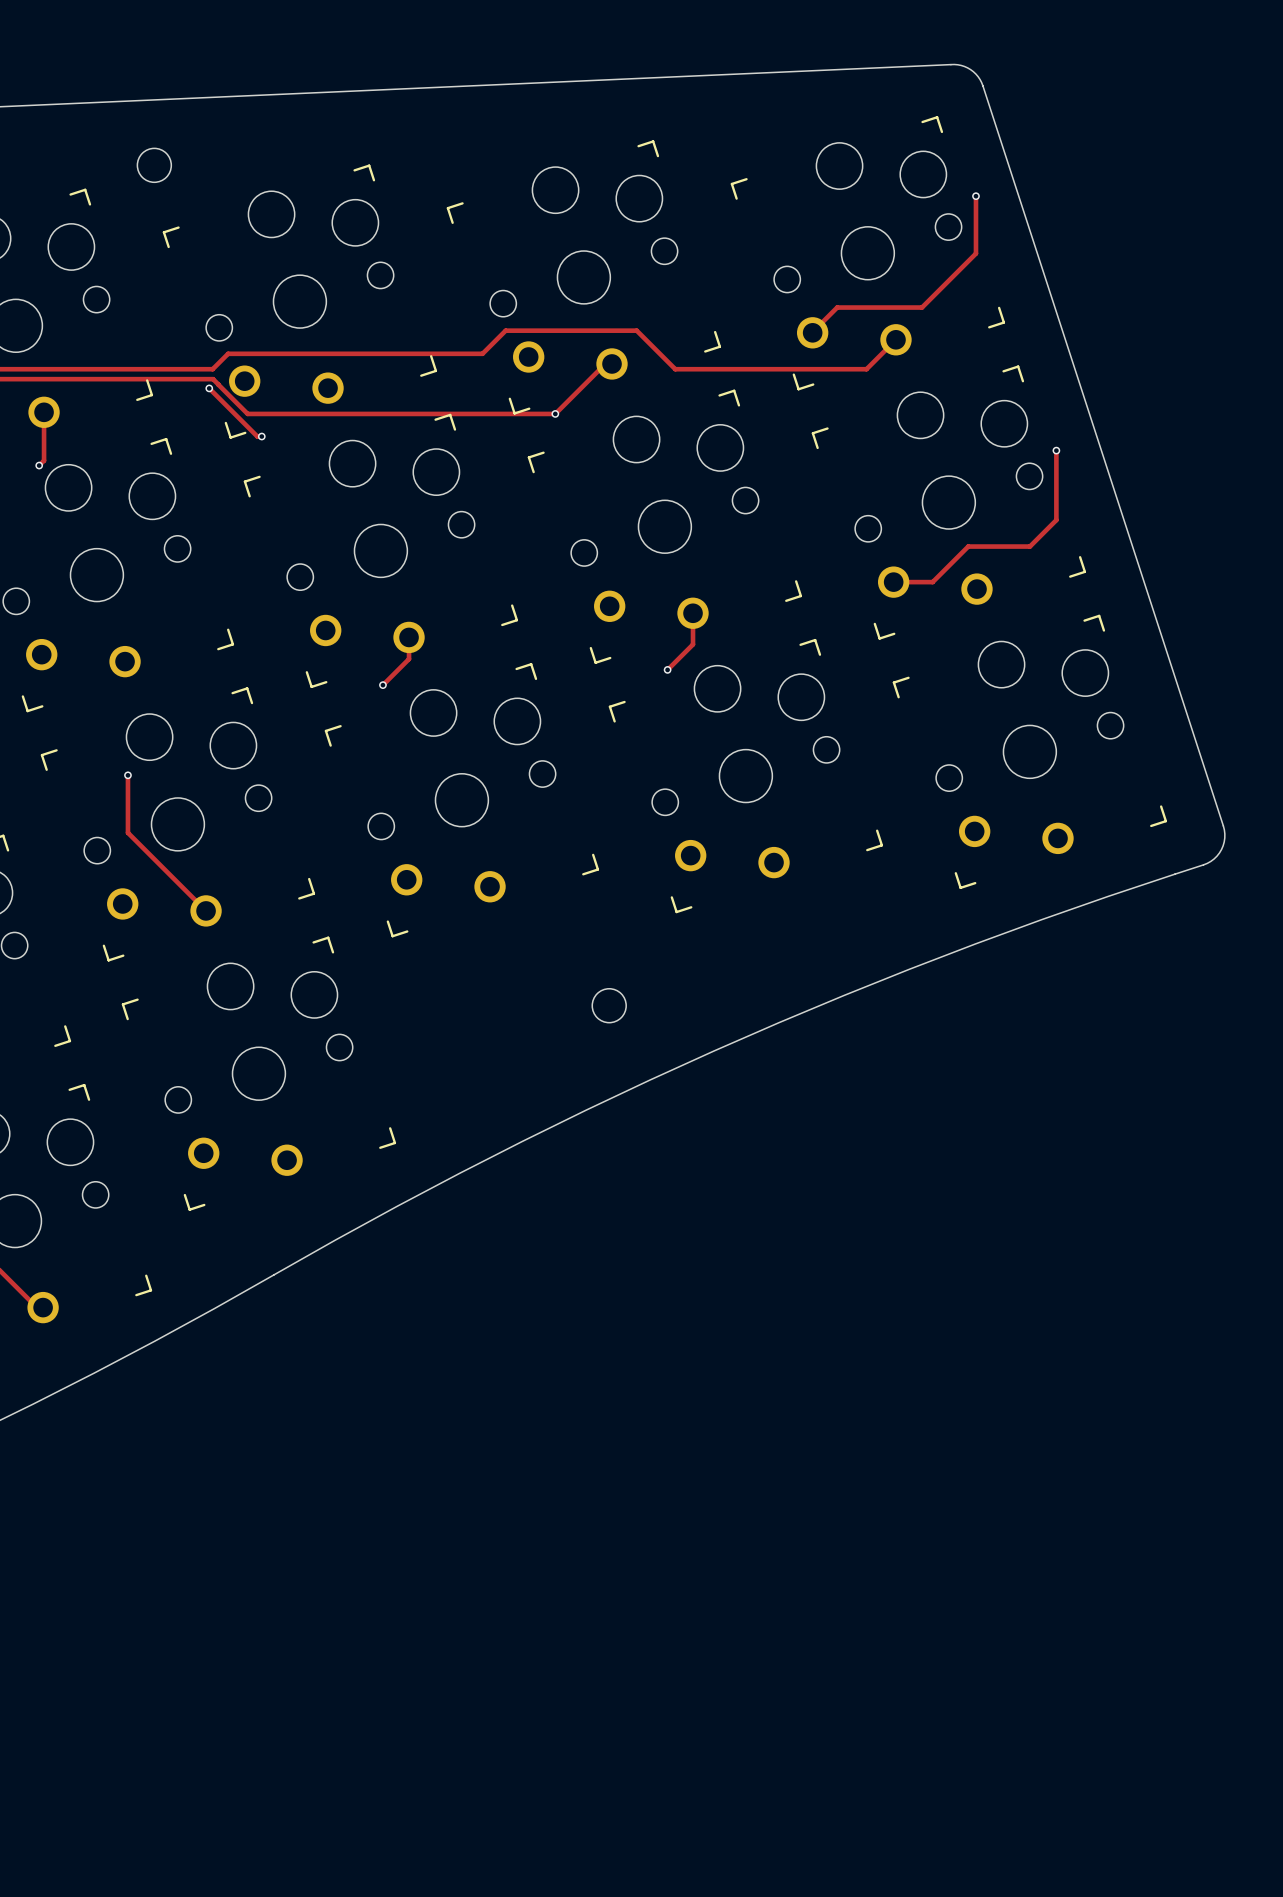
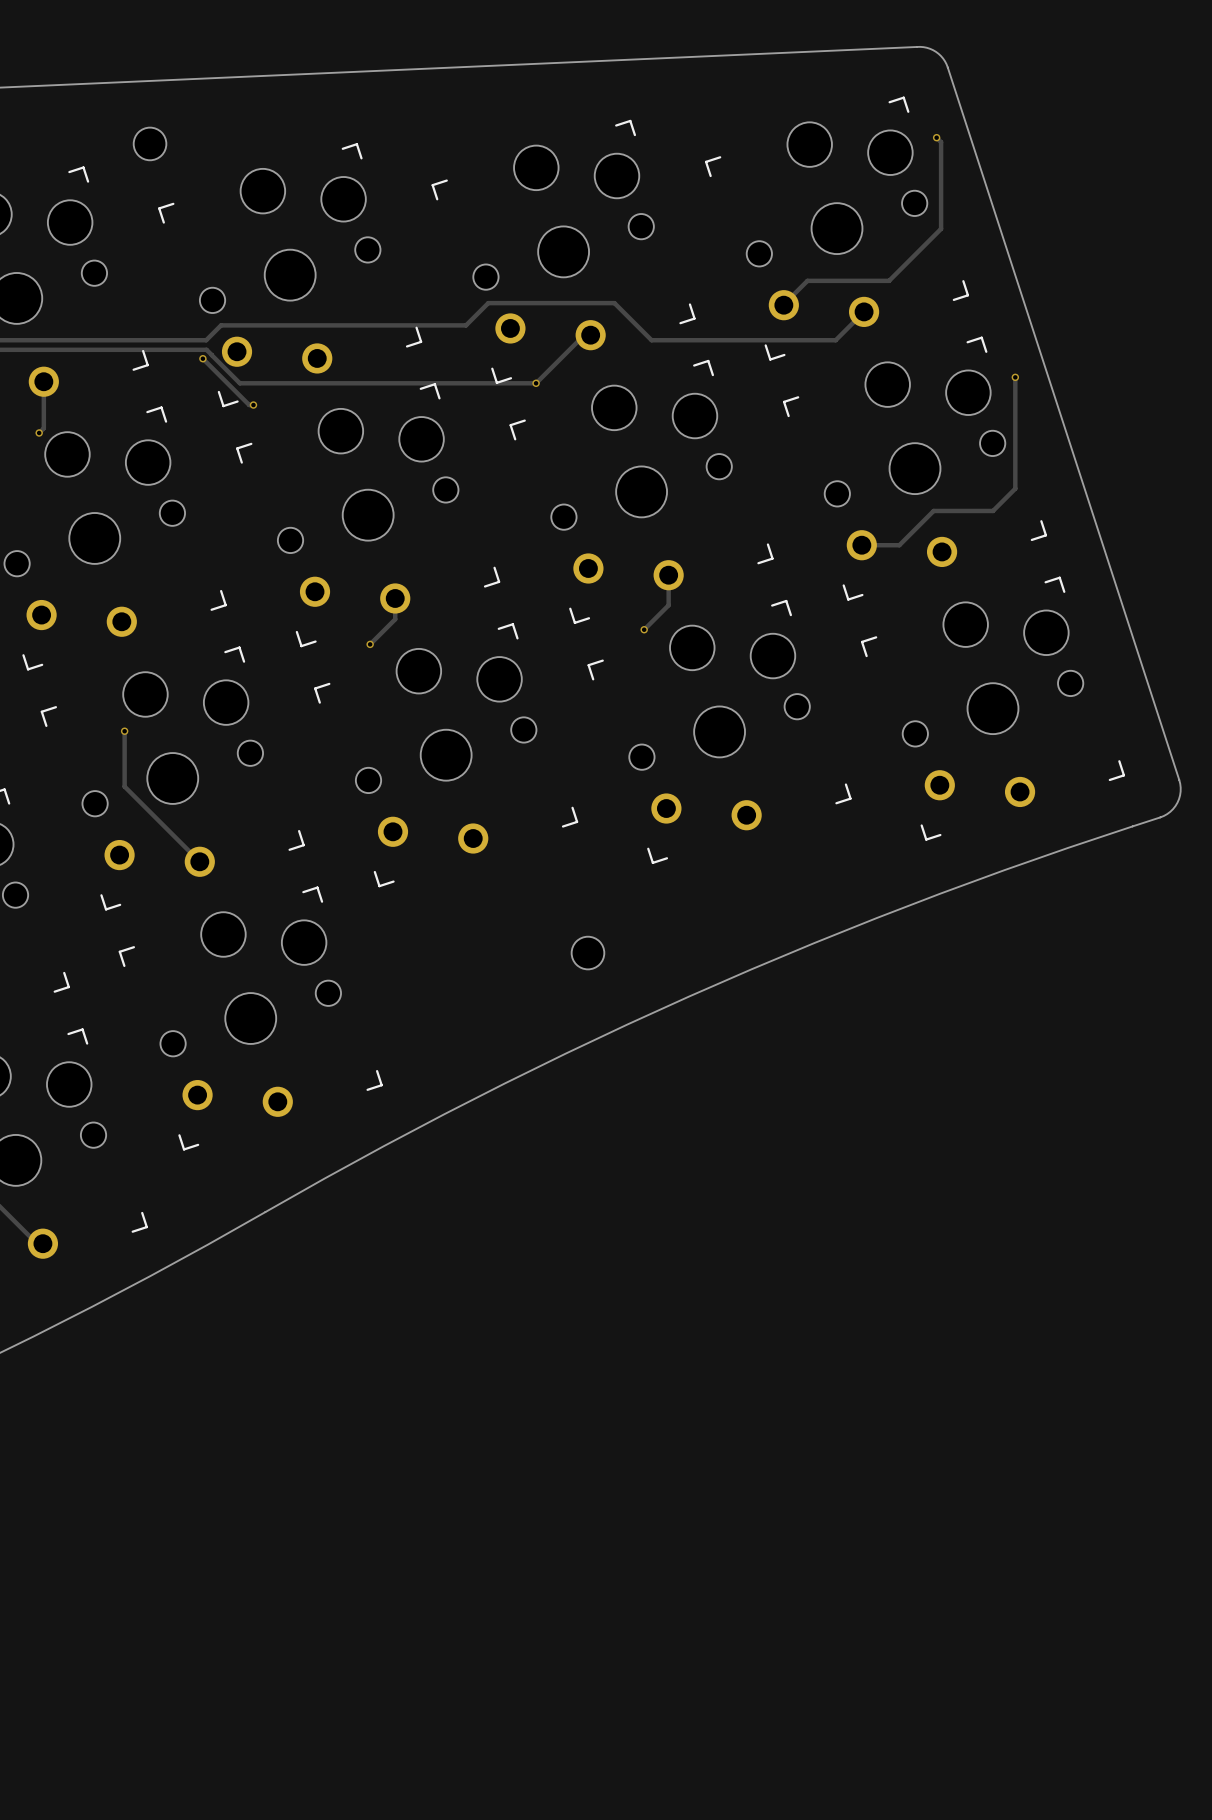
track: none -> (936, 137) (941, 142) (941, 173)
via position: (975, 196) -> (936, 137)
track: (1056, 450) (1056, 520) (1029, 546) -> (1015, 377) (1015, 488) (993, 510)
via position: (1056, 450) -> (1015, 377)

